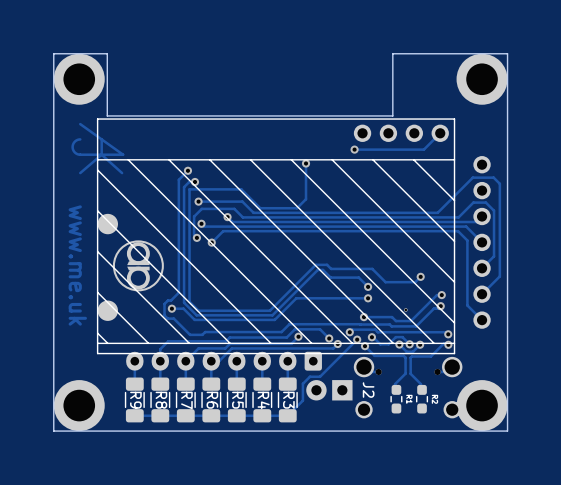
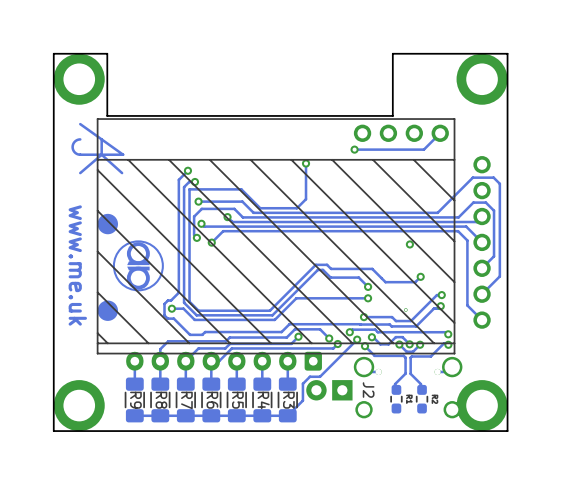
via: none -> (409, 244)

